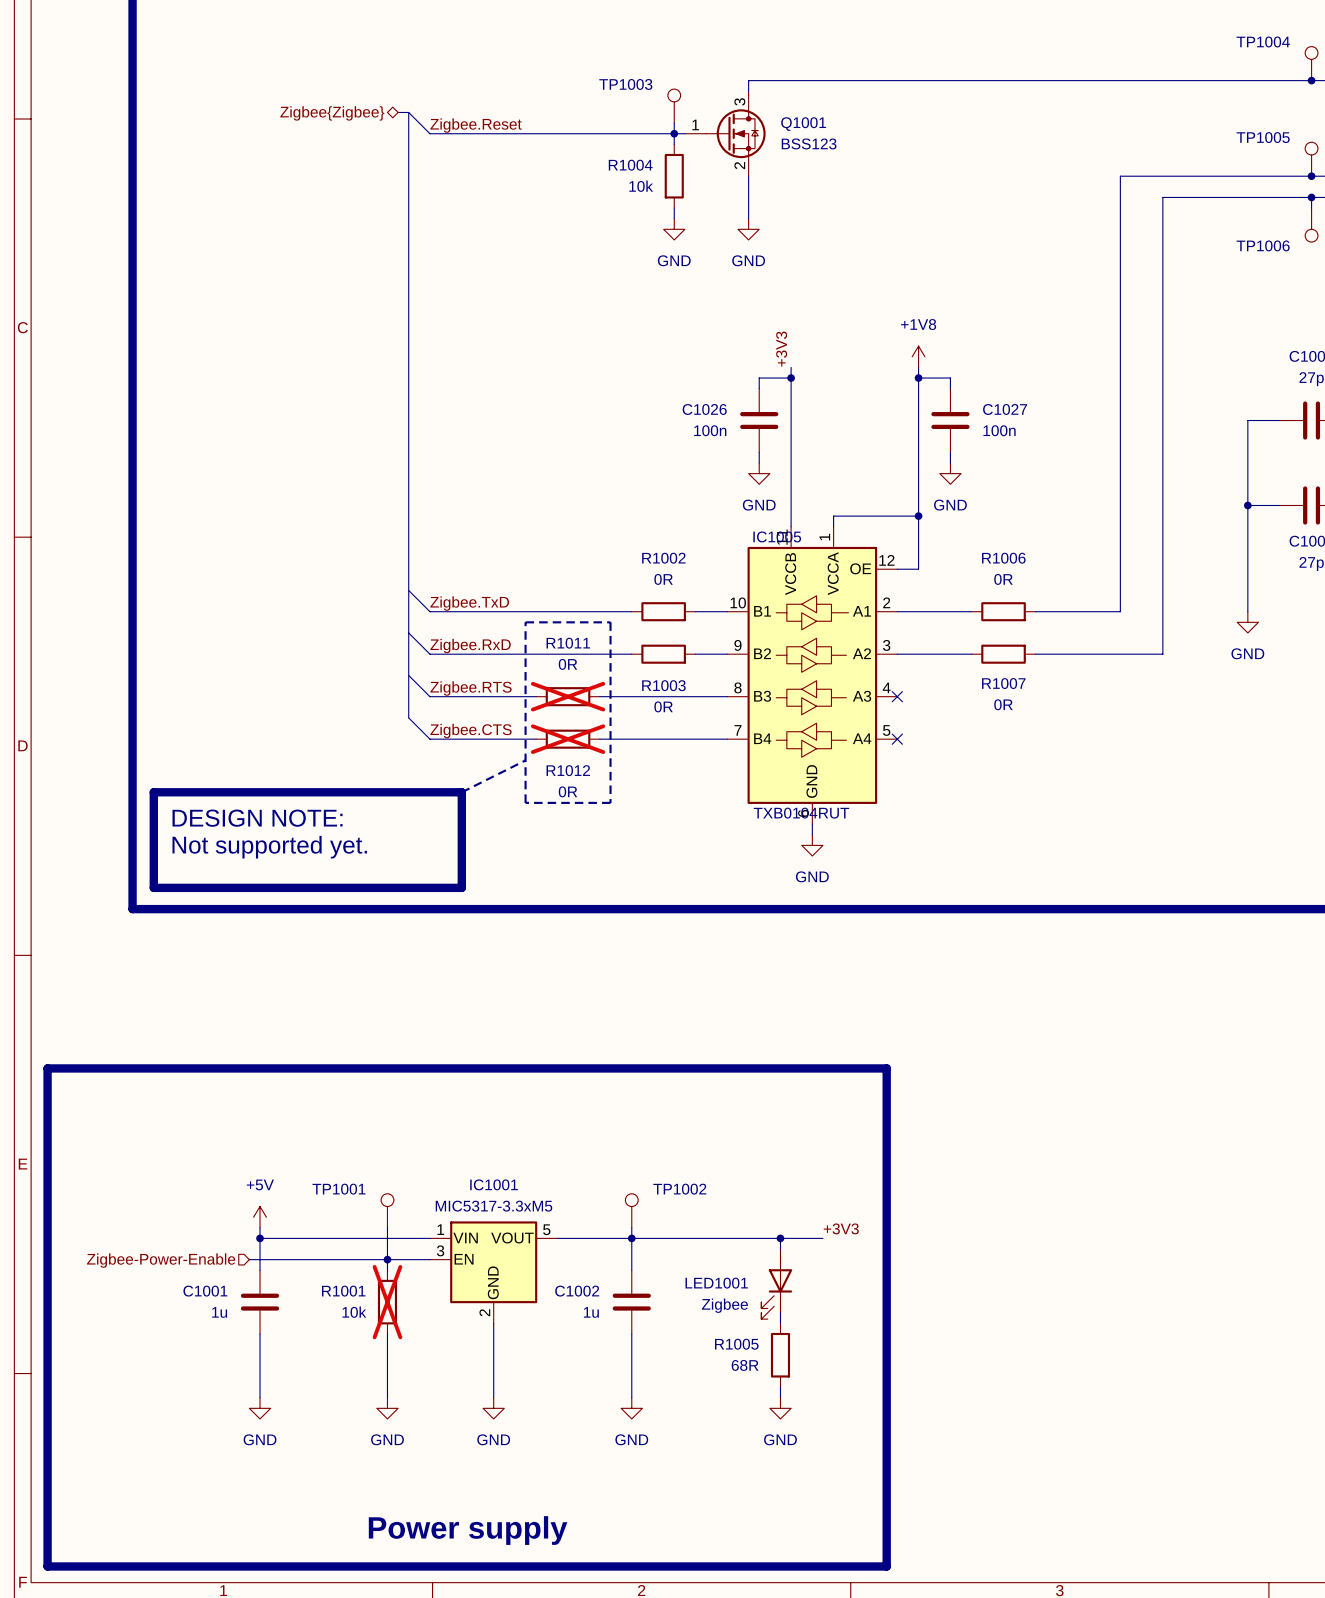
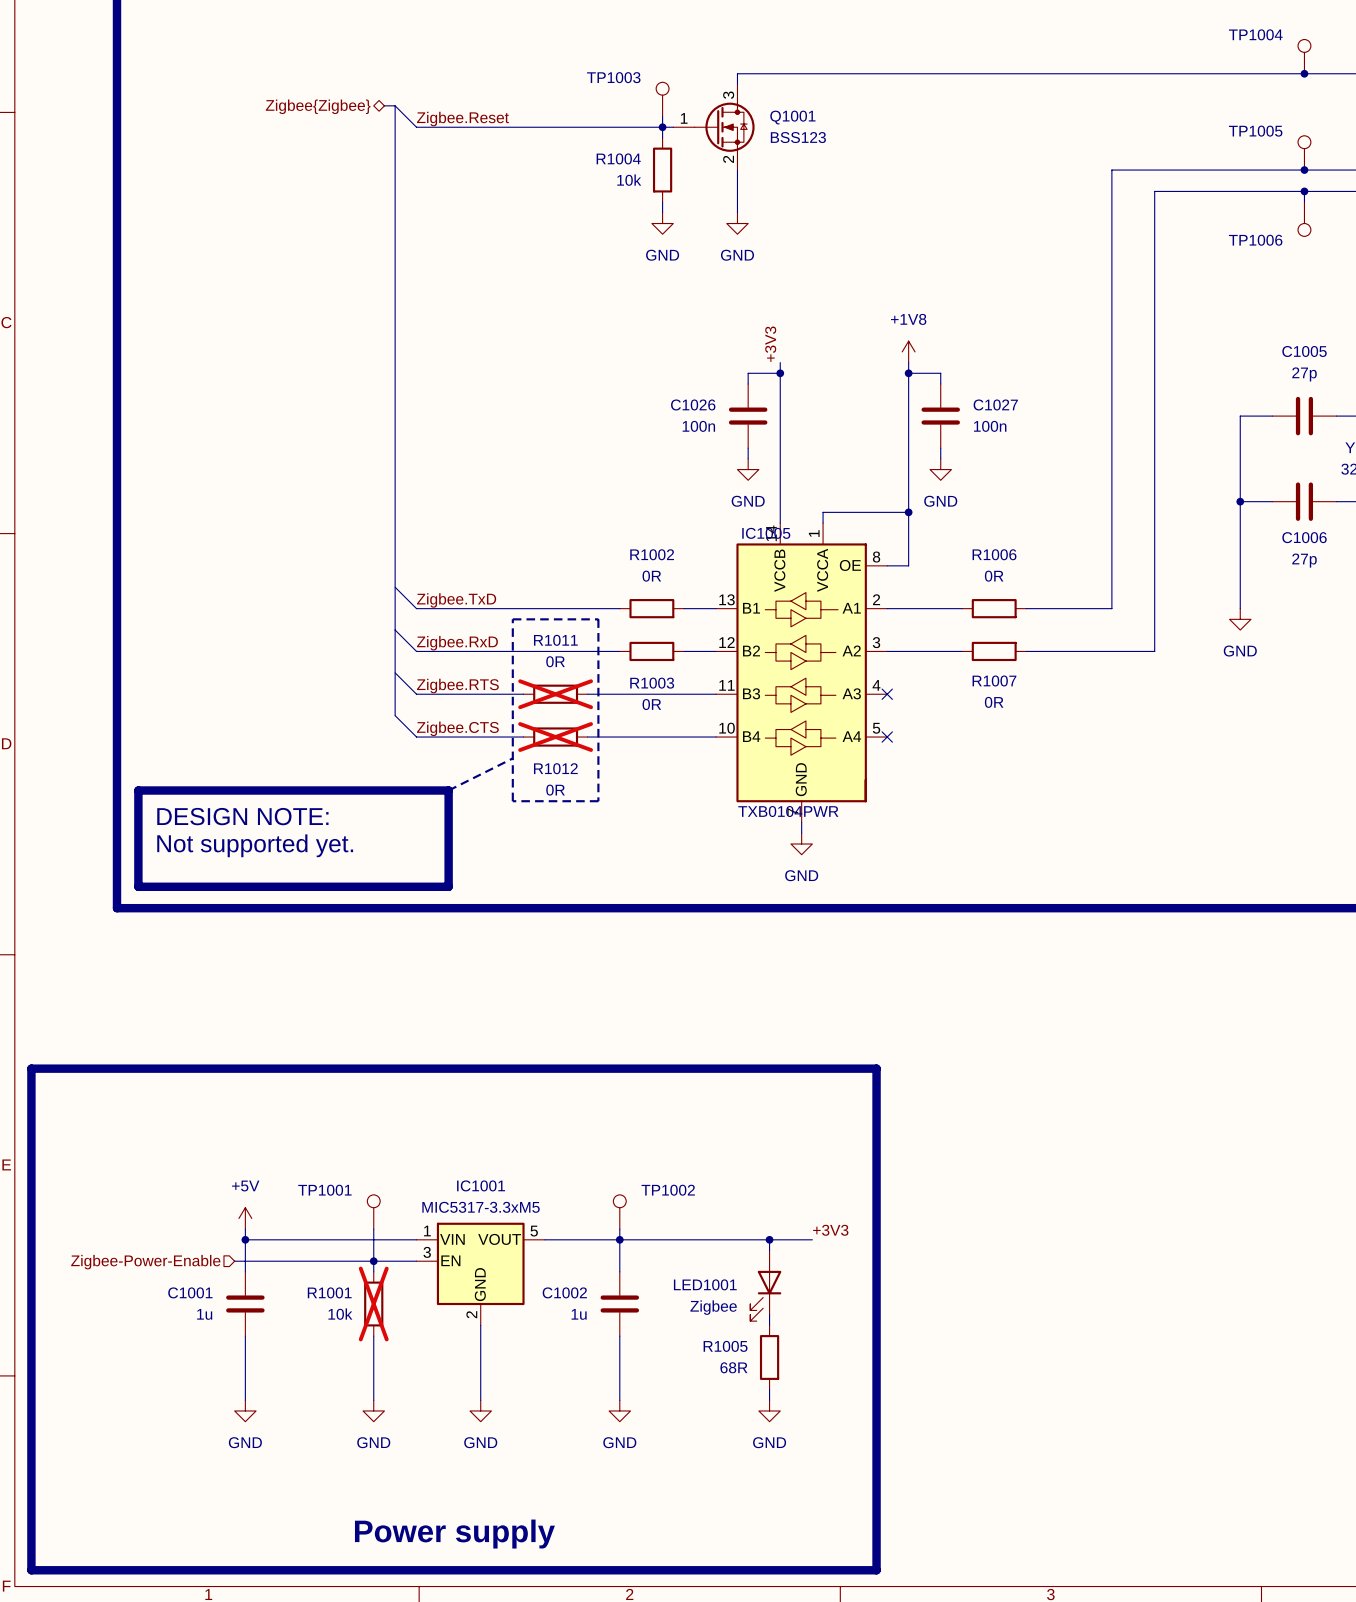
IC1005 symbol: [727, 526, 898, 825] -> [716, 523, 888, 823]
IC1005 value: TXB0104RUT (801, 813) -> TXB0104PWR (788, 811)

